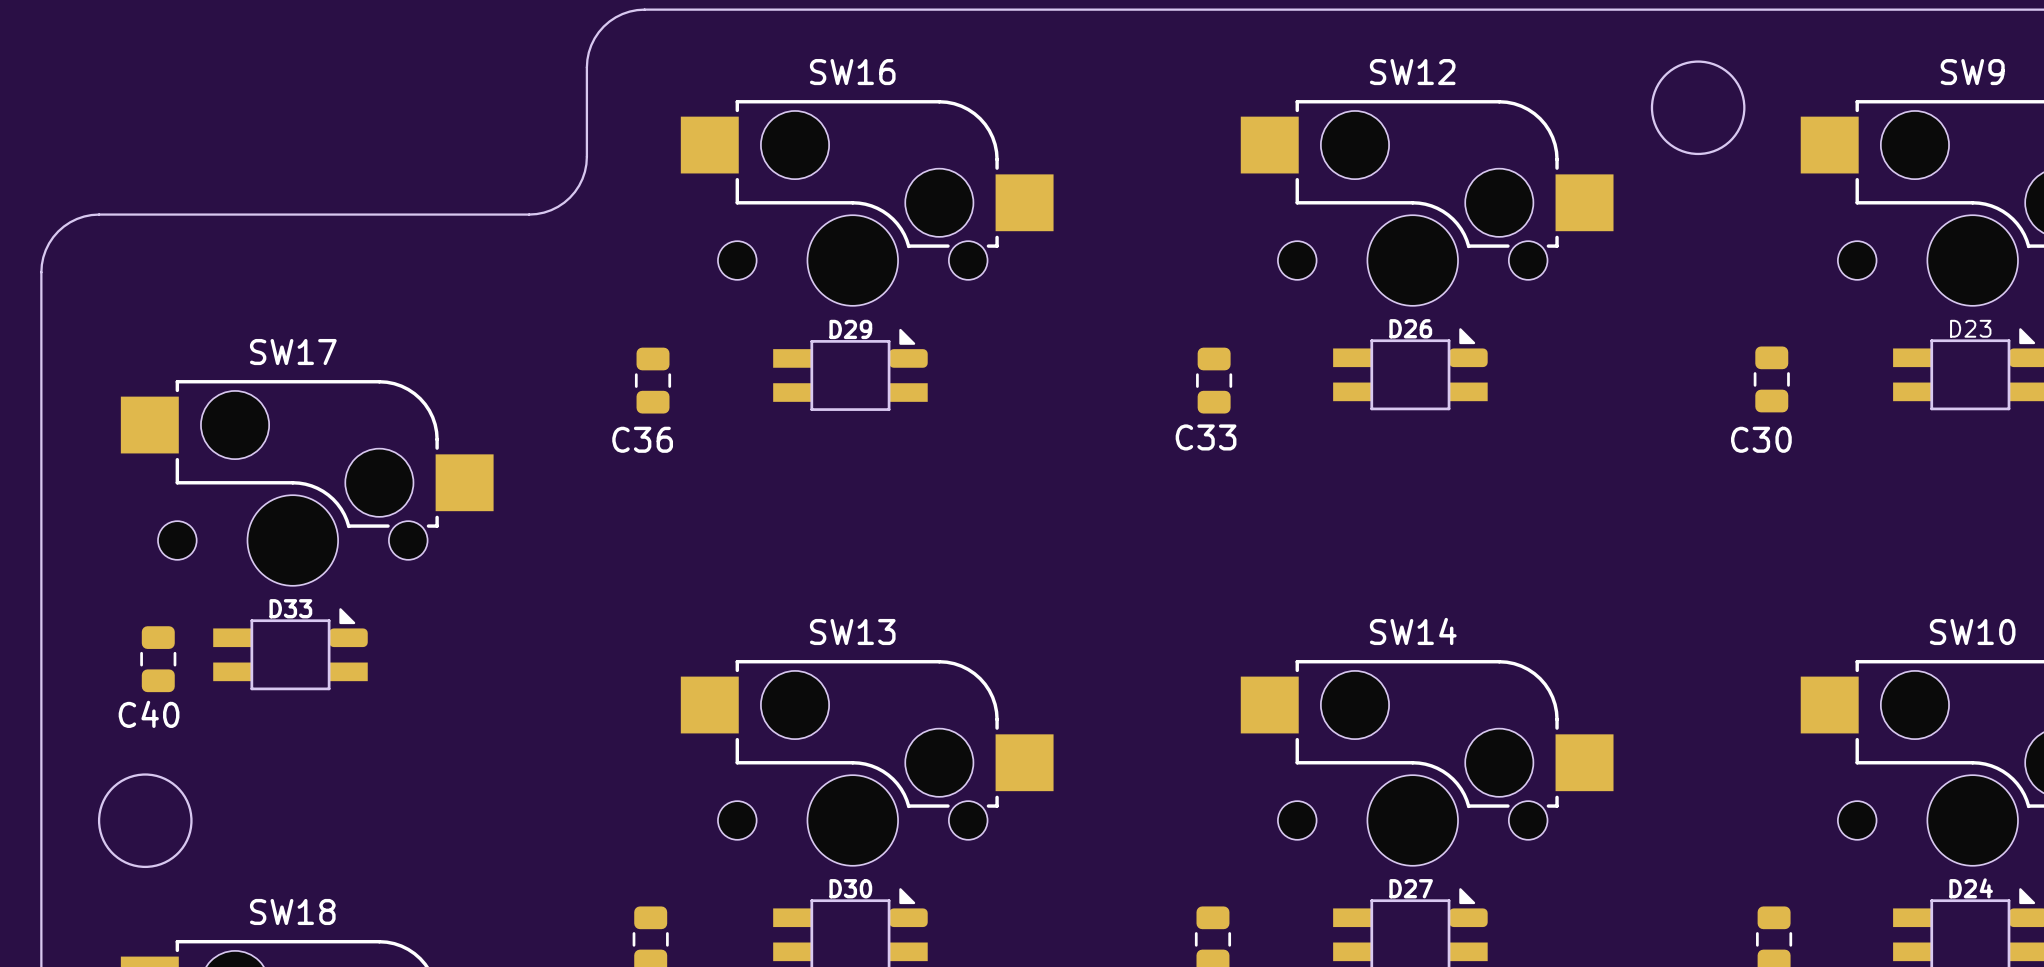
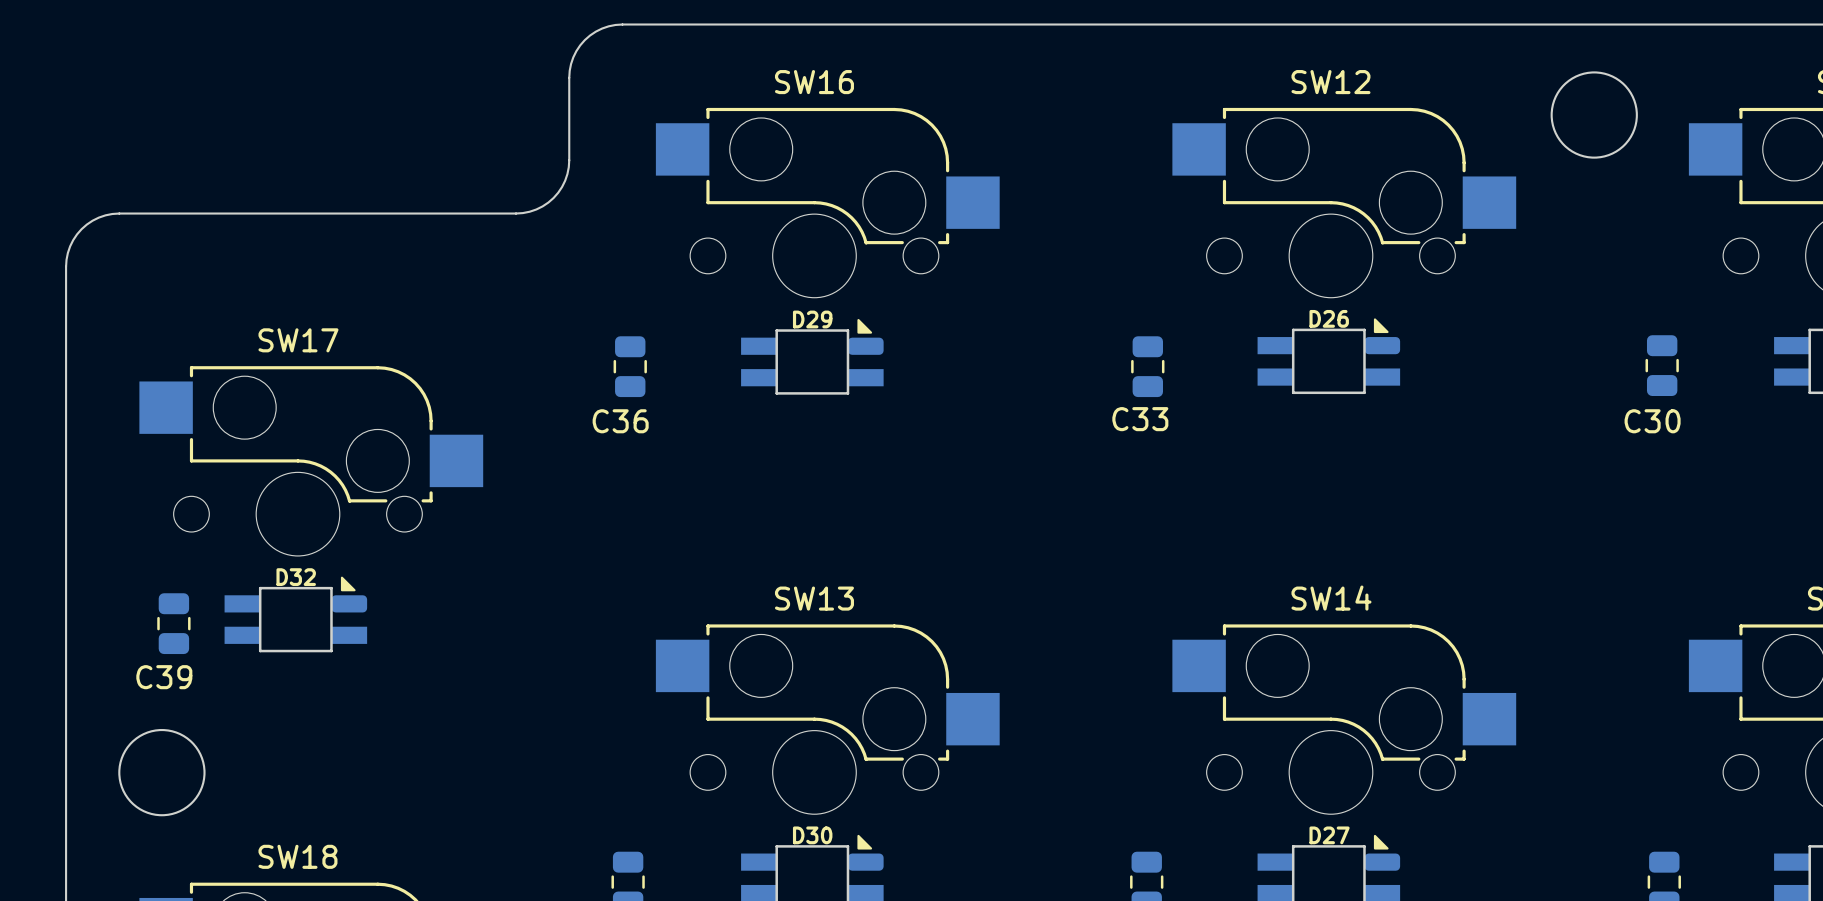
D33 name: D33 (290, 608) -> D32 (296, 577)
C40 name: C40 (149, 714) -> C39 (164, 677)

